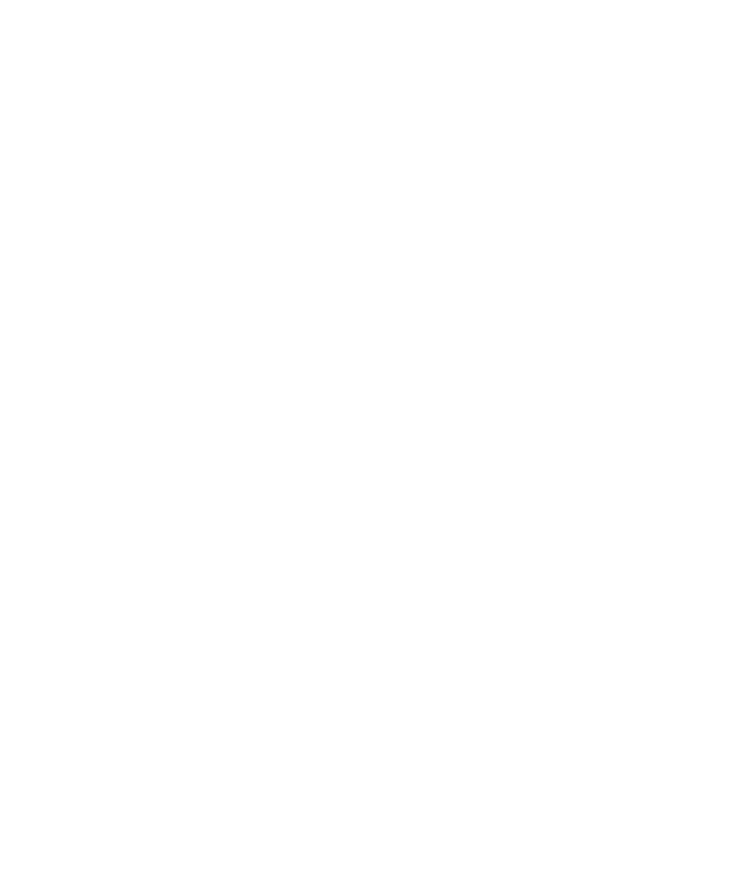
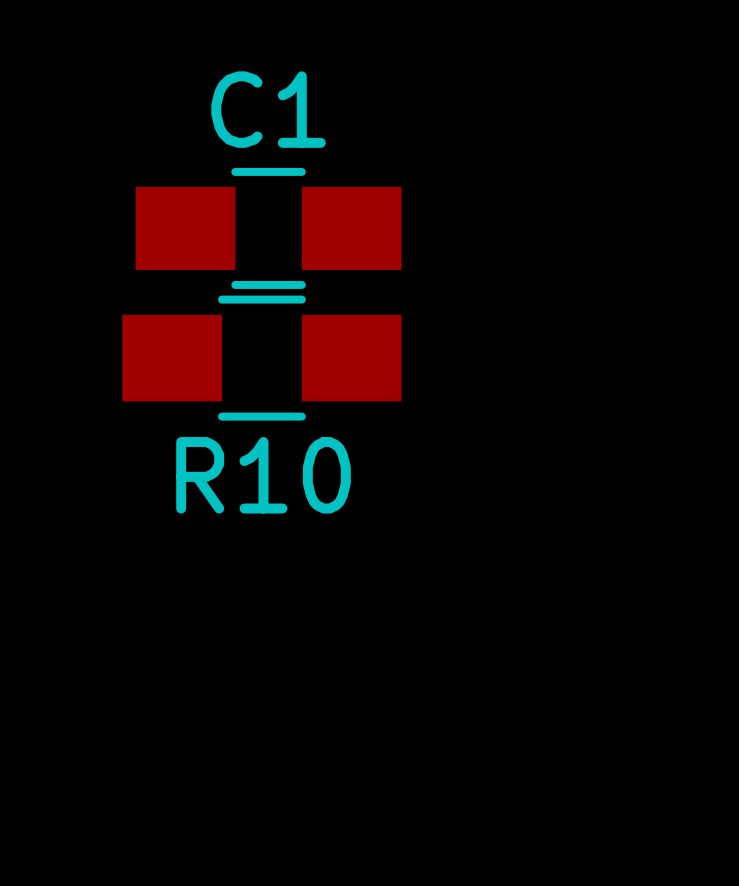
C1: none -> (268, 228)
R10: none -> (261, 358)

